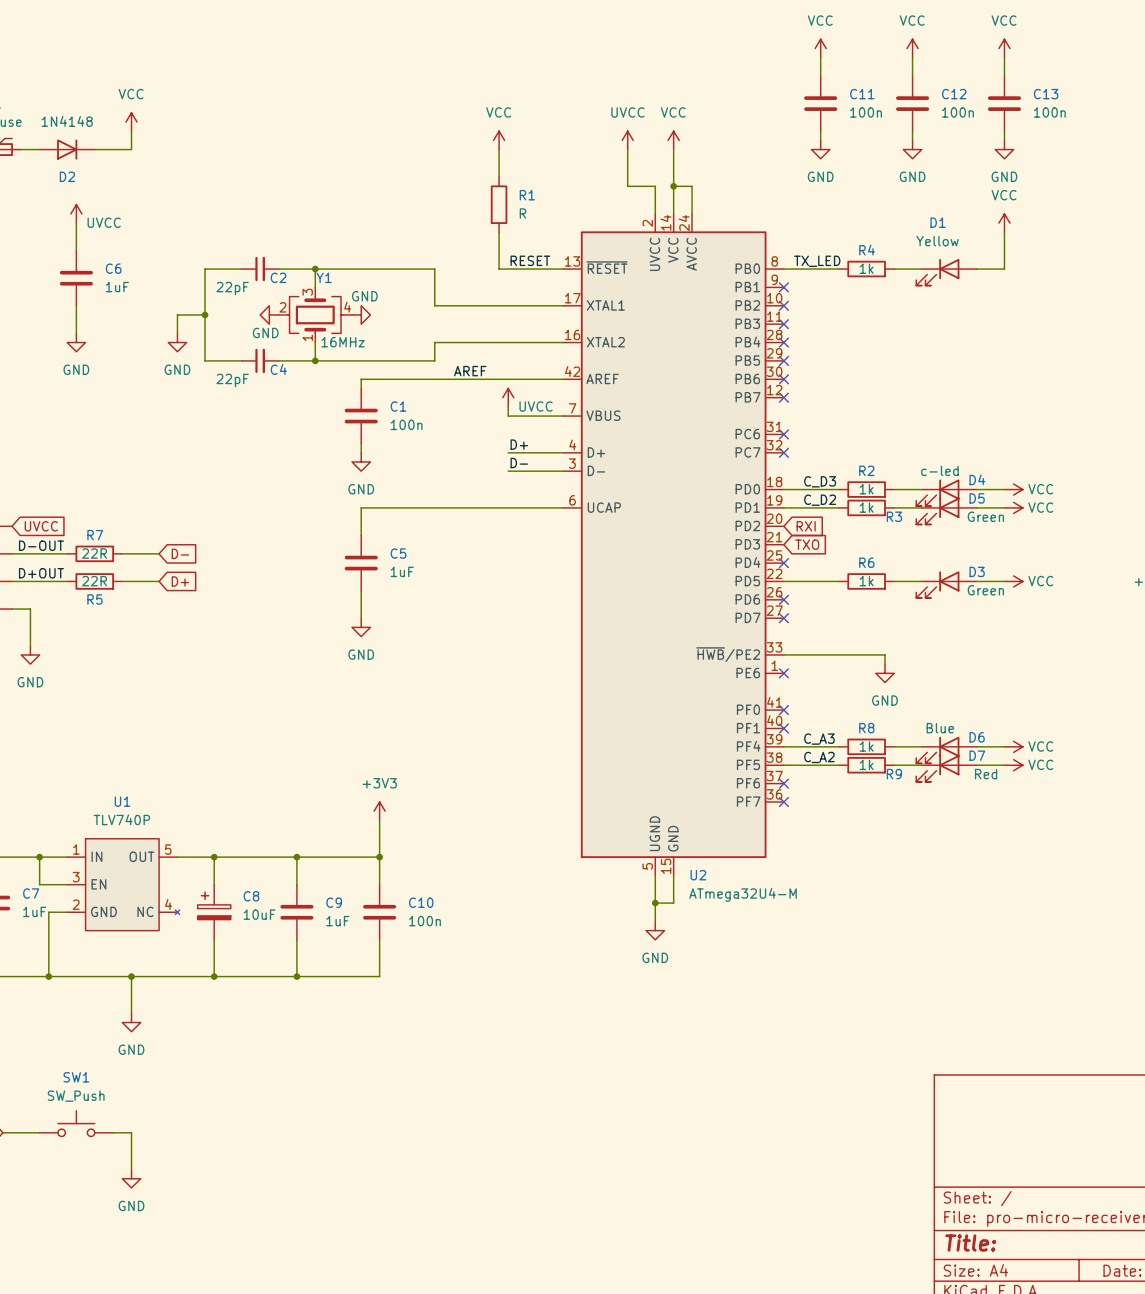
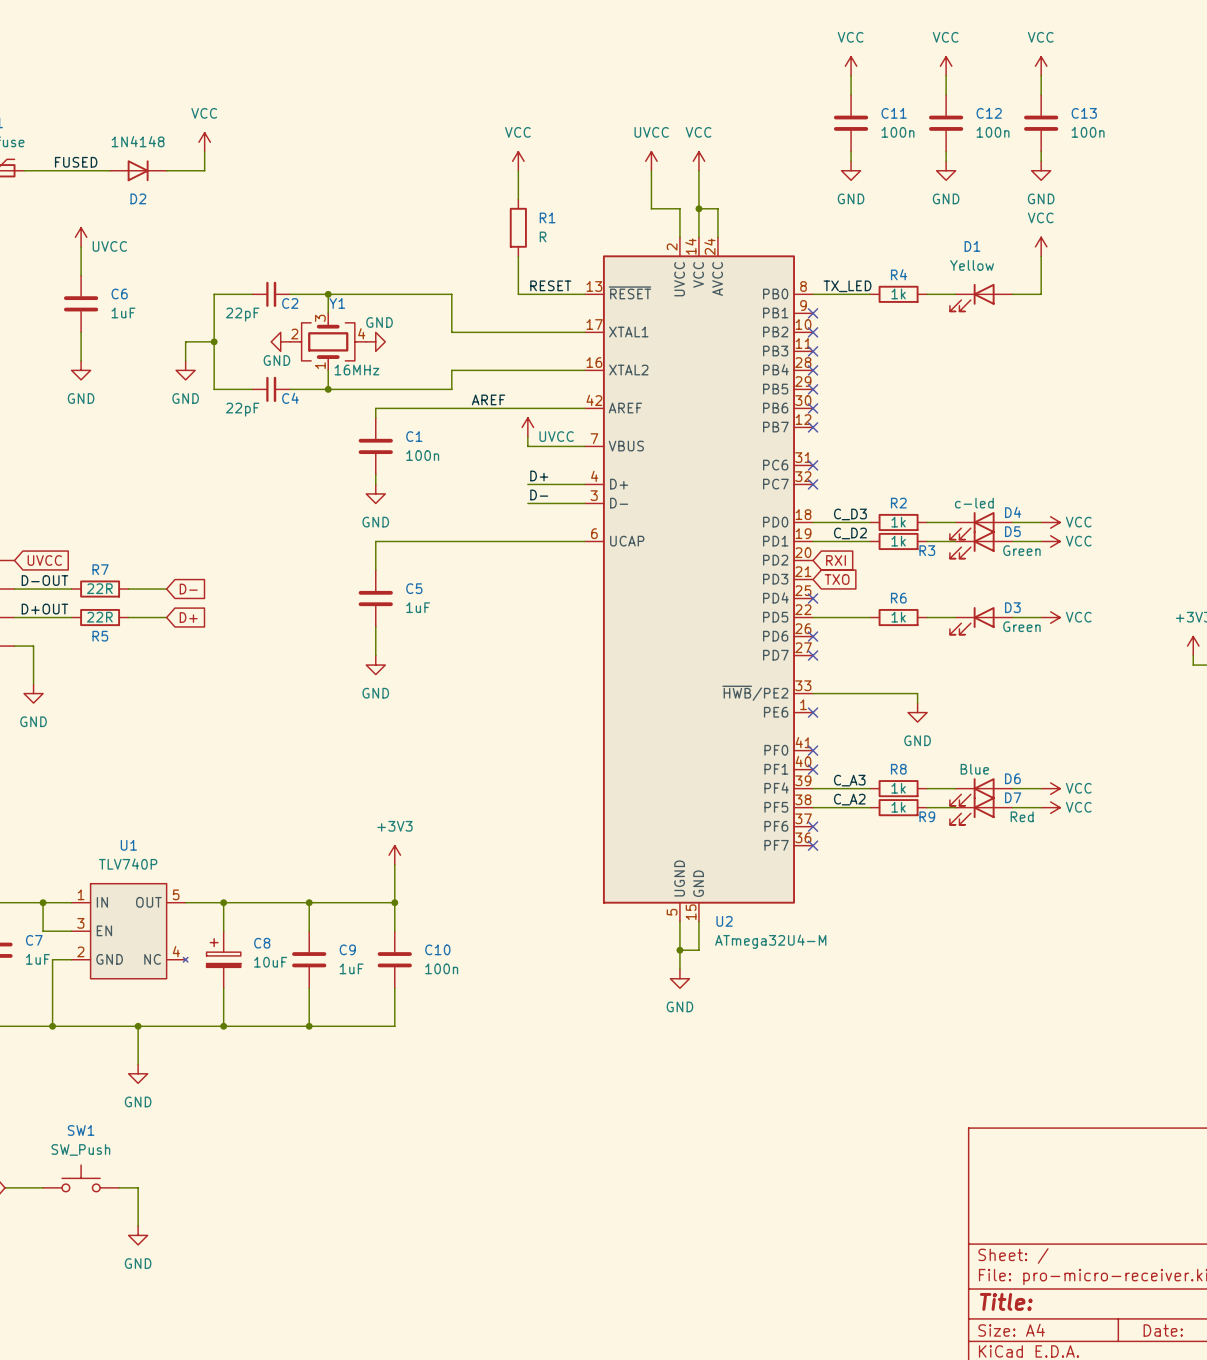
power symbol position: VCC (131, 122) -> VCC (204, 142)
wire: (131, 131) (131, 149) (103, 149) -> none
wire: none -> (204, 151) (204, 170) (166, 170)
label: none -> FUSED (76, 162)
D2 position: (67, 149) -> (138, 170)

